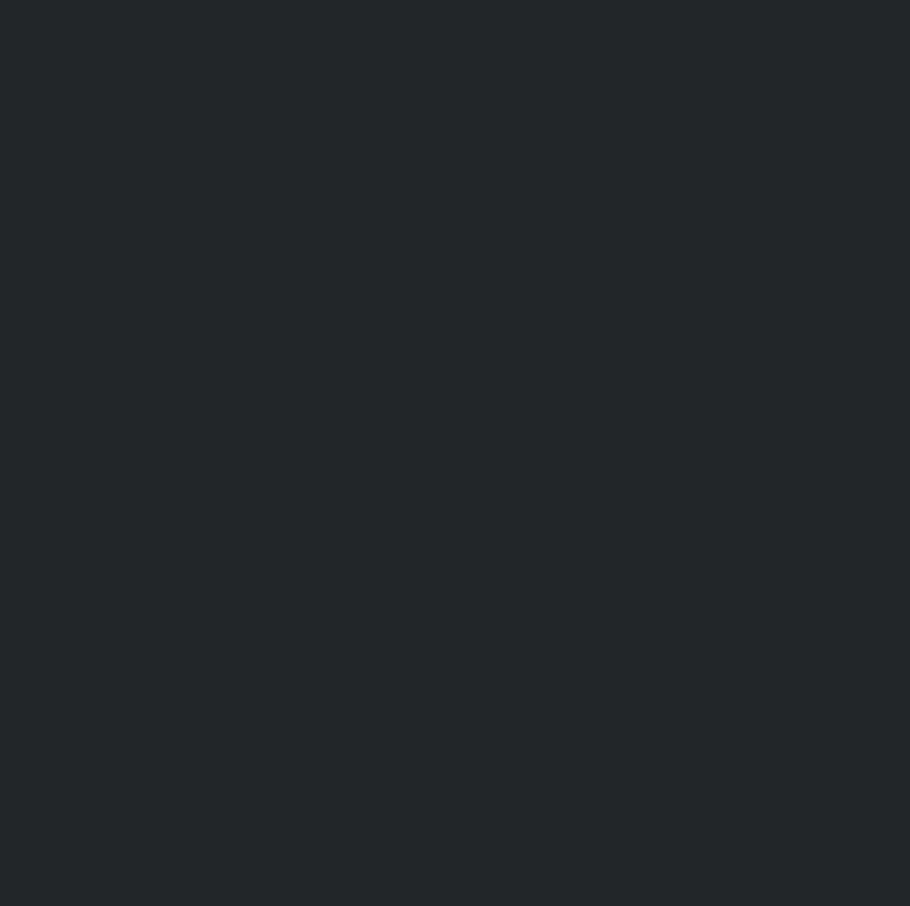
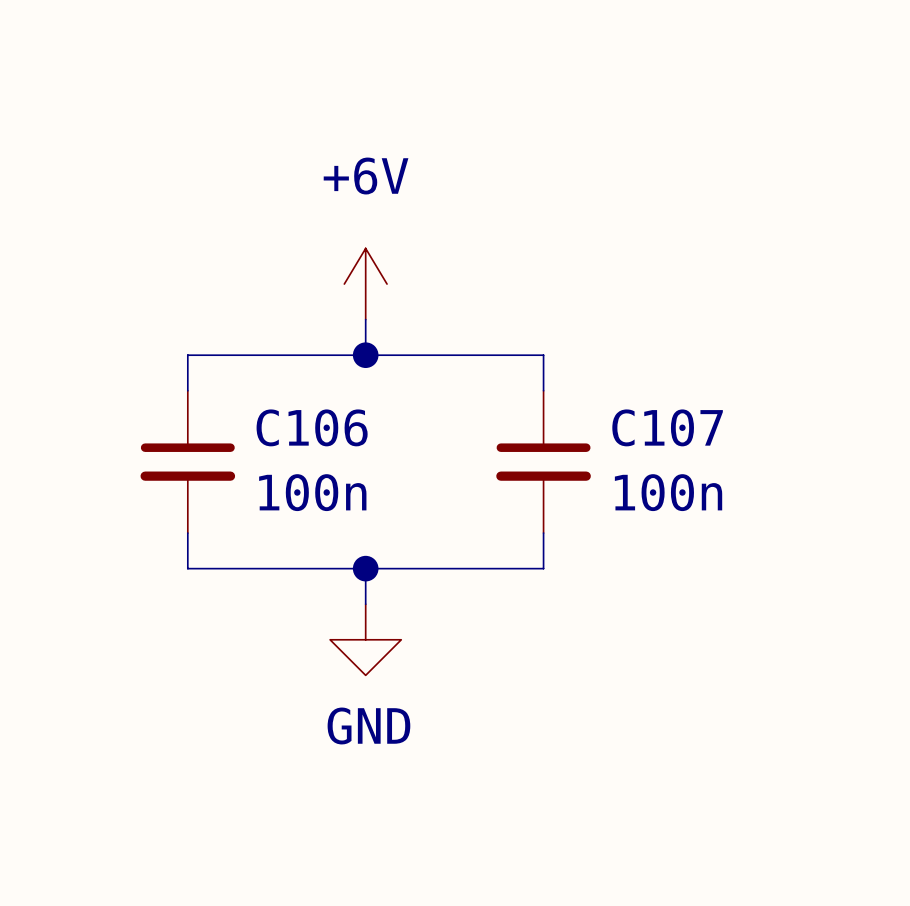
power symbol: none -> +6V (365, 284)
wire: none -> (365, 319) (365, 355)
junction: none -> (365, 355)
wire: none -> (187, 390) (187, 355) (543, 355) (543, 390)
C106: none -> 100n (187, 461)
C107: none -> 100n (543, 461)
wire: none -> (187, 533) (187, 568) (543, 568) (543, 533)
wire: none -> (365, 568) (365, 604)
junction: none -> (365, 568)
power symbol: none -> GND (365, 639)

